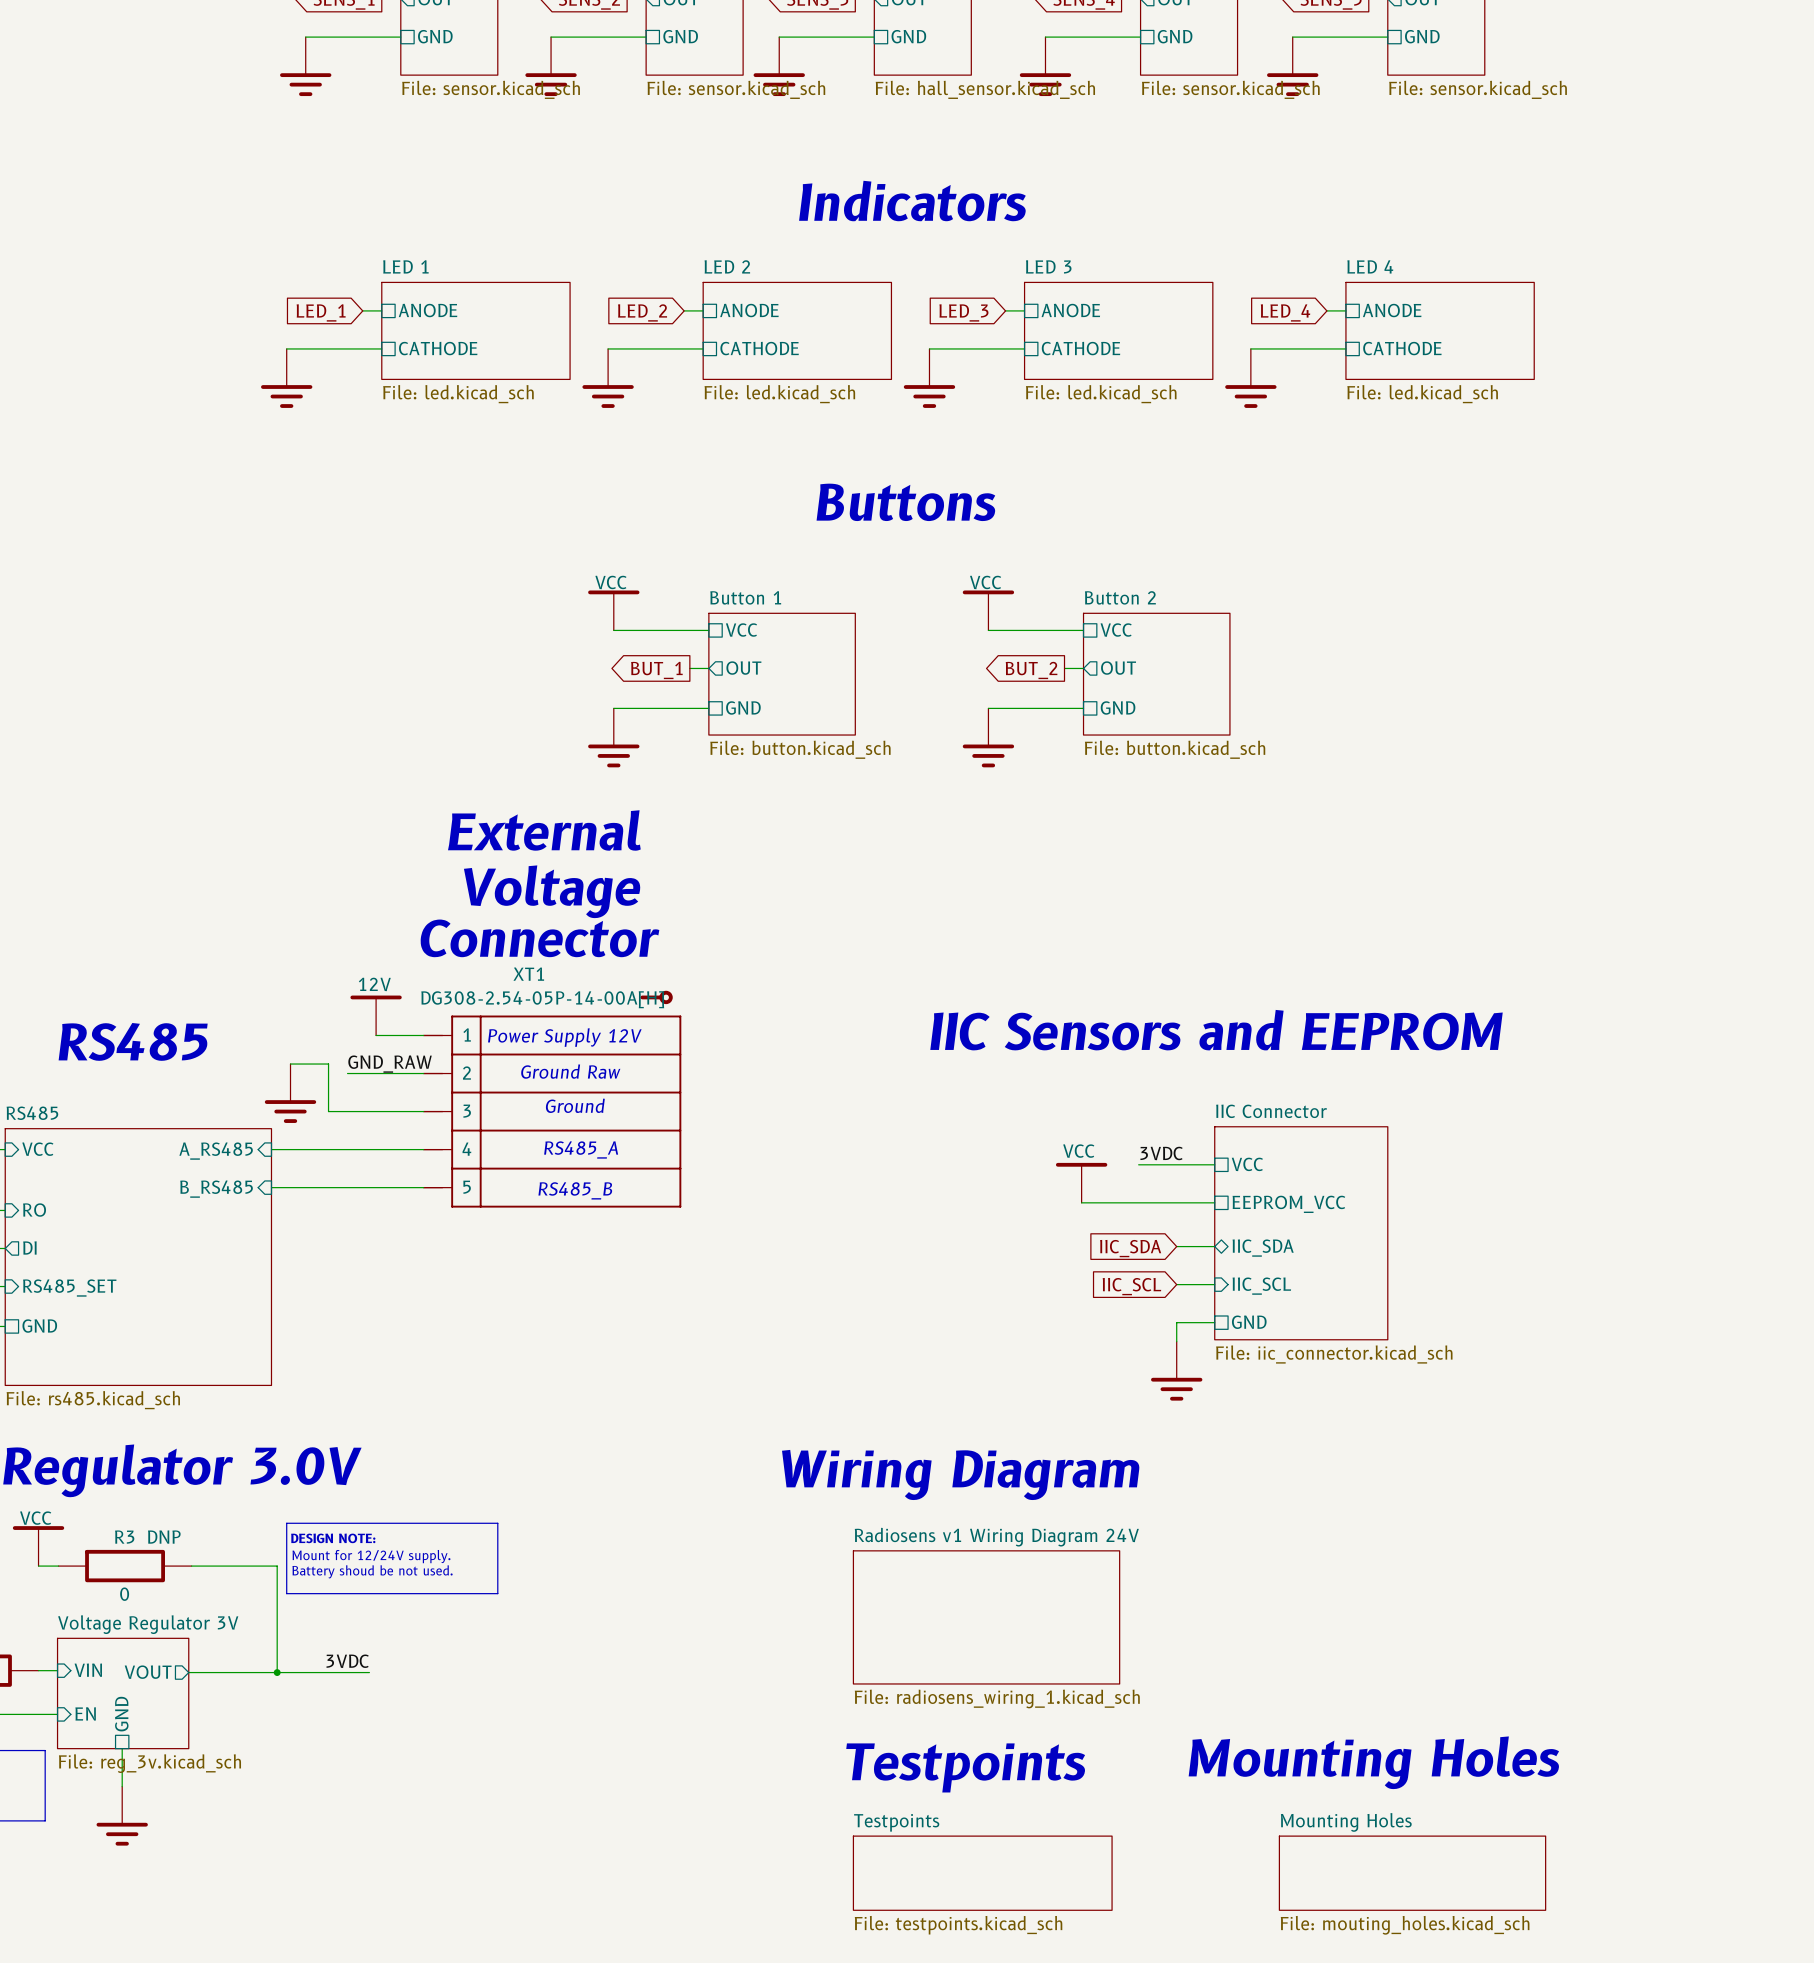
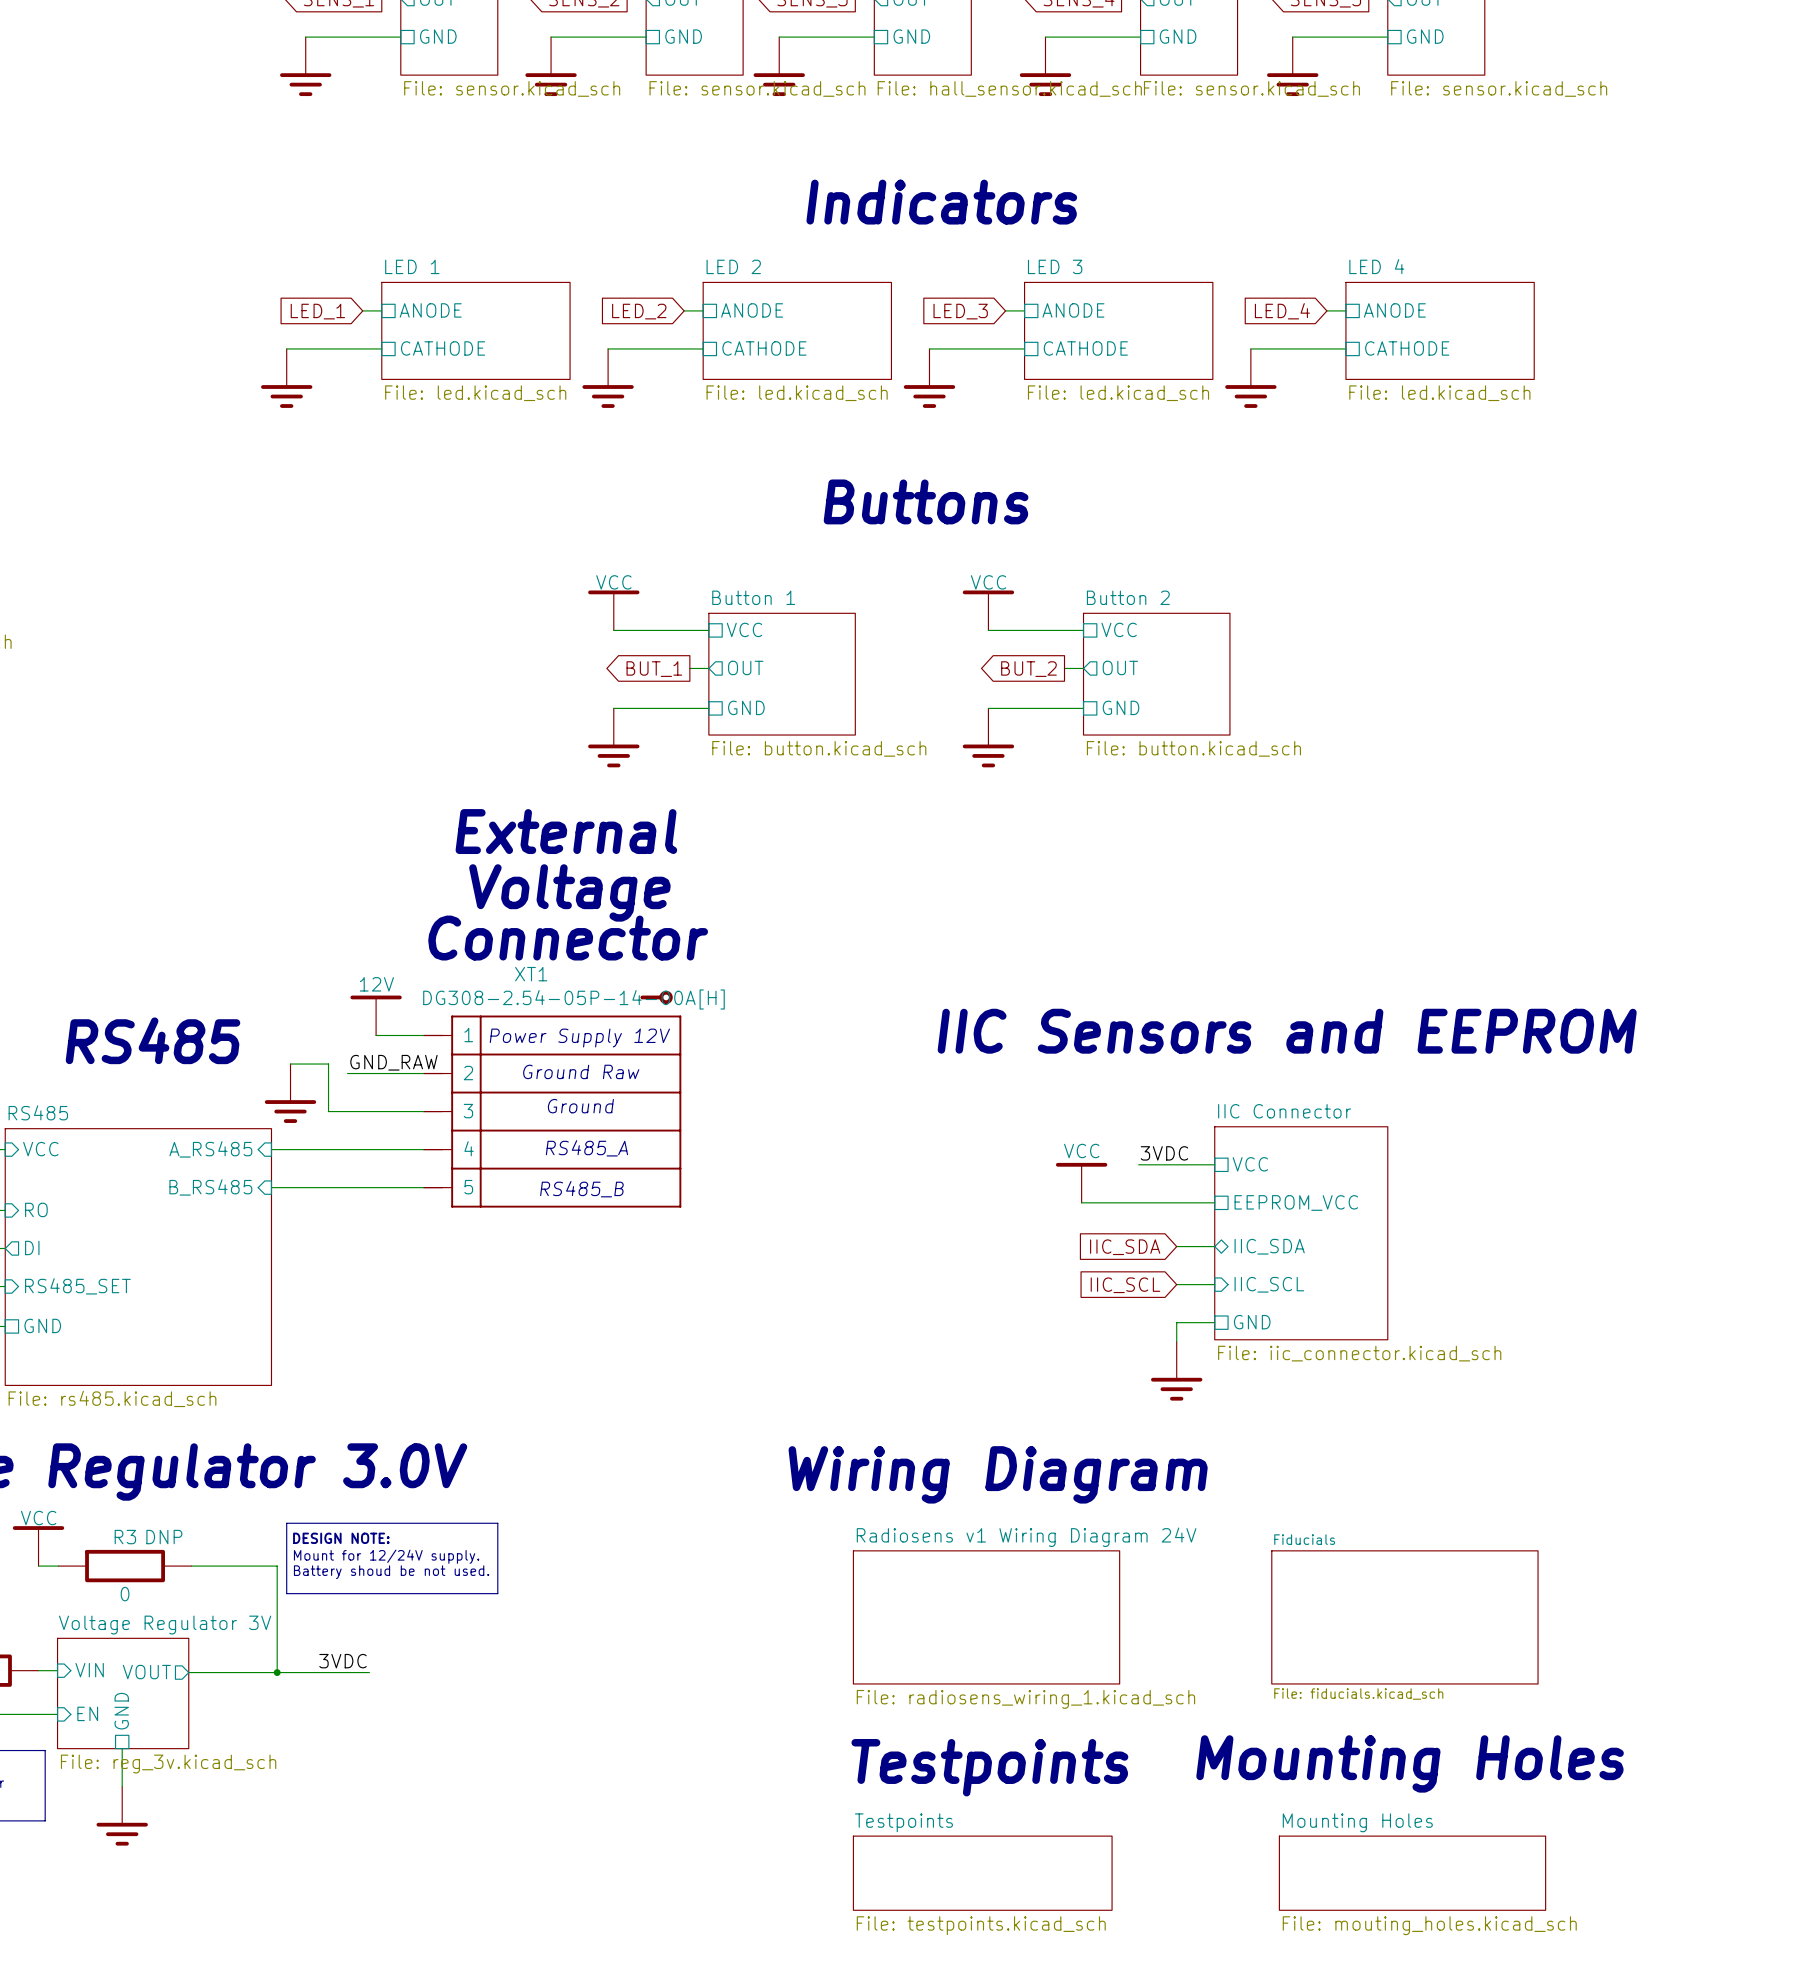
sheet Fiducials: none -> File: fiducials.kicad_sch (1404, 1617)

